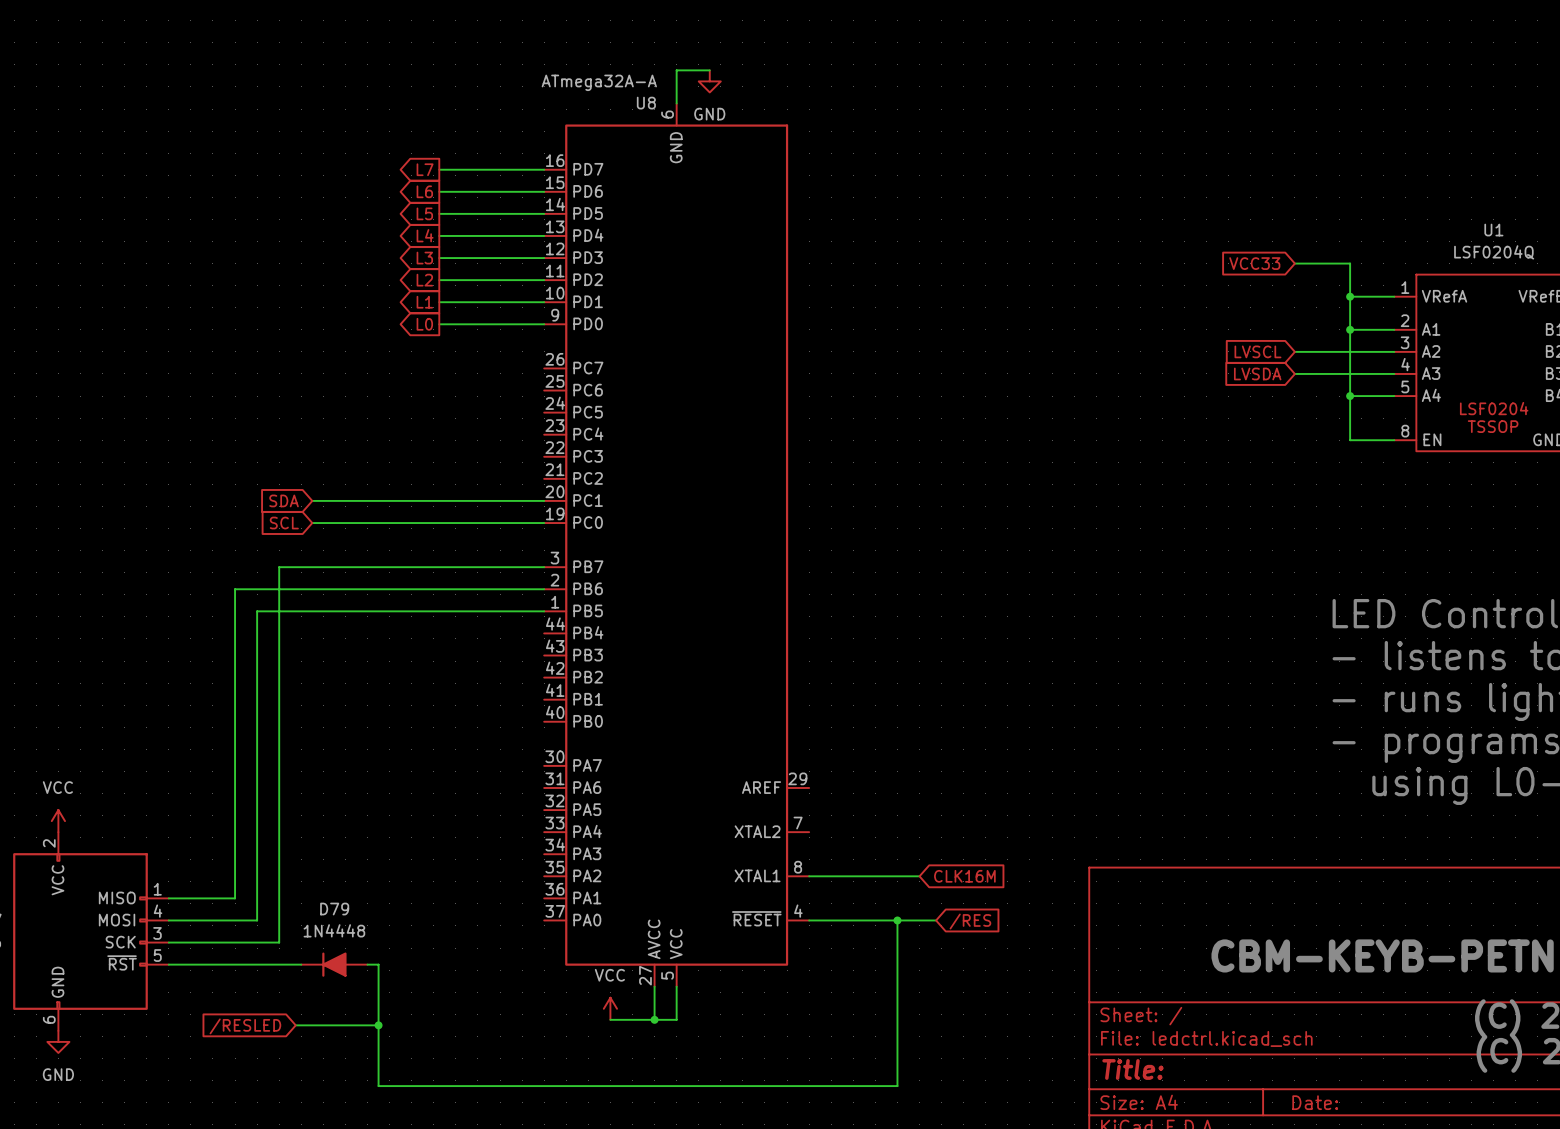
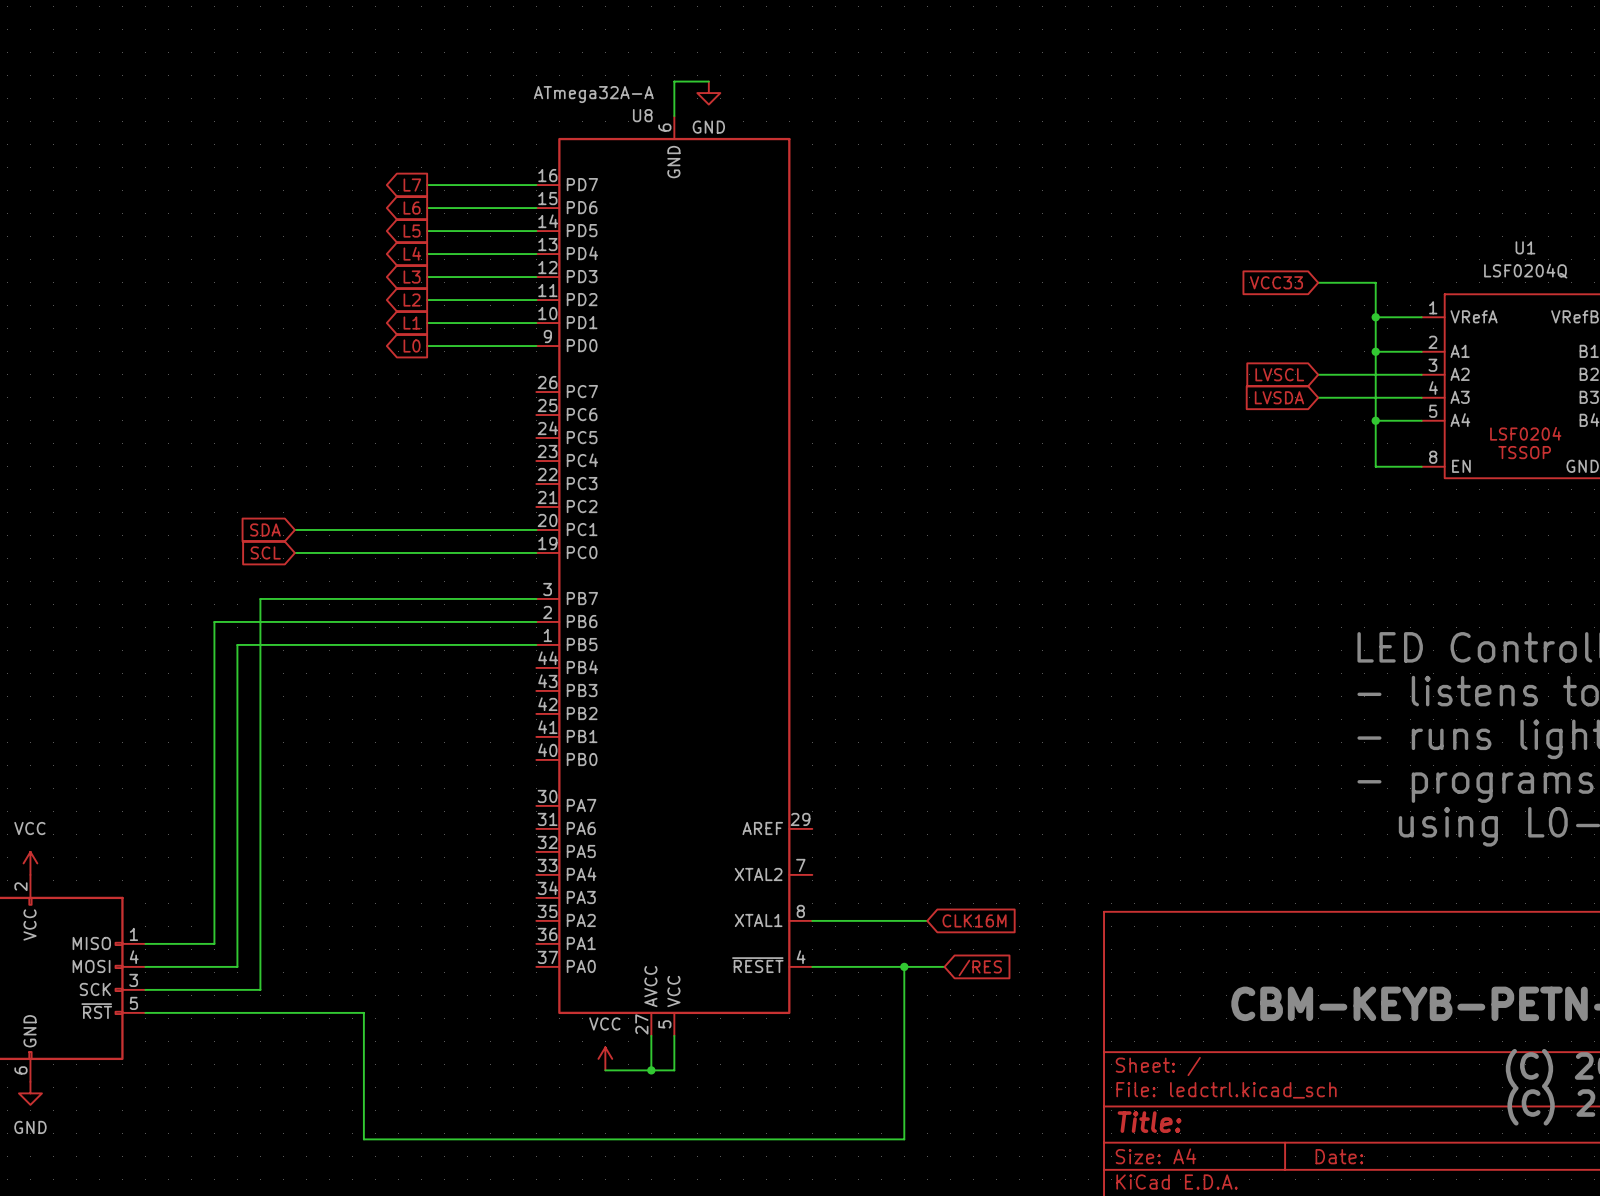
D79: 1N4448 (334, 964) -> none
wire: (295, 1025) (378, 1025) -> none
junction: (378, 1025) -> none
global label: /RESLED (245, 1026) -> none

